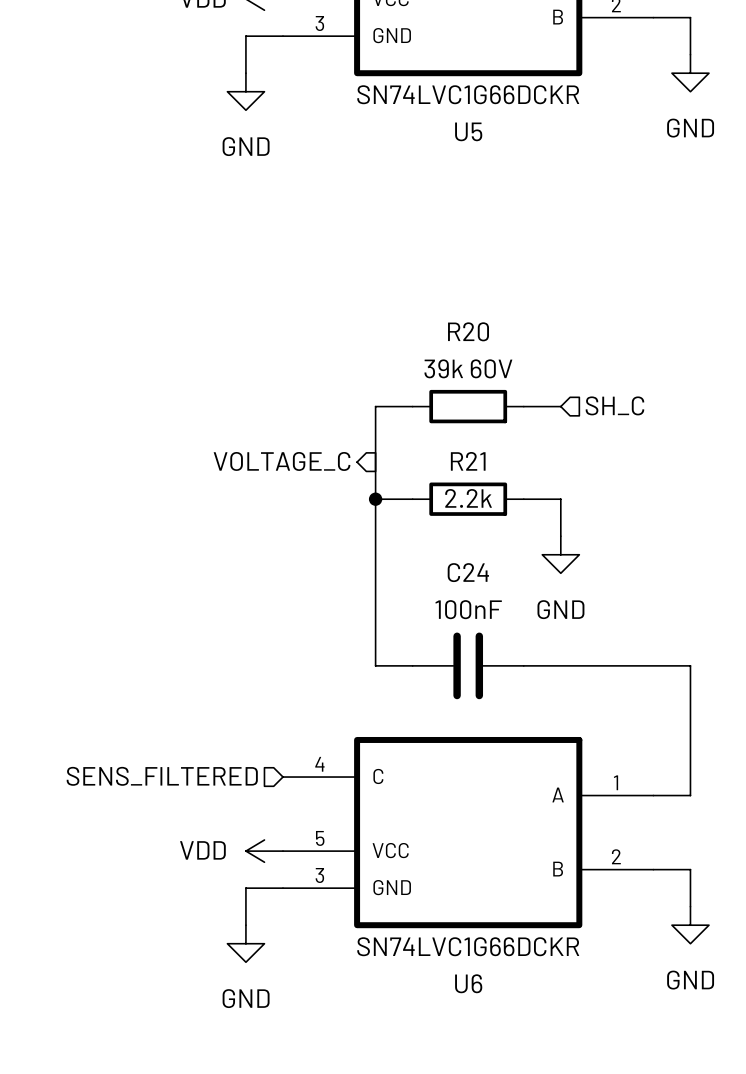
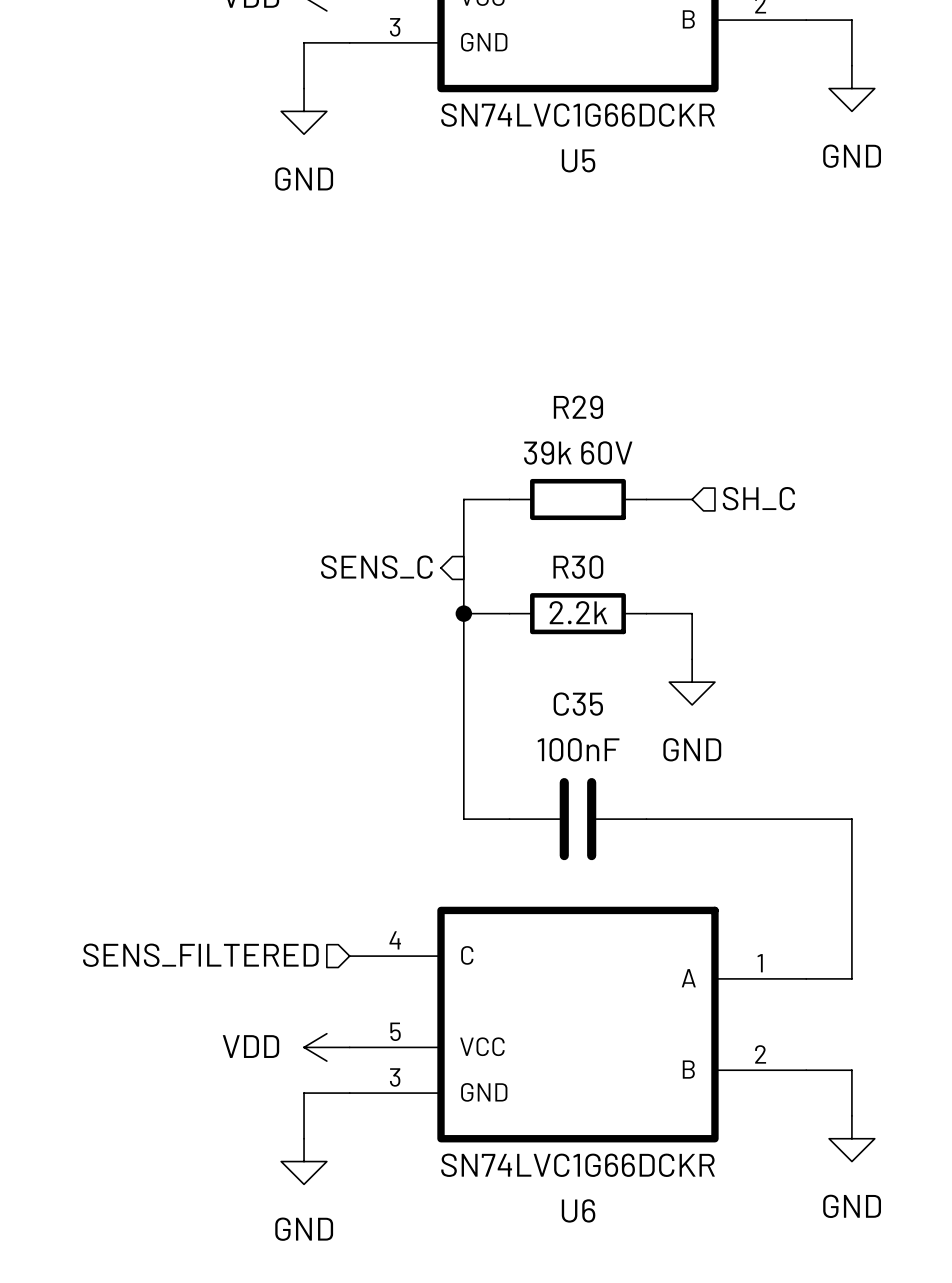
R20 name: R20 (468, 331) -> R29 (578, 407)
hierarchical label: VOLTAGE_C (282, 461) -> SENS_C (376, 567)
R21 name: R21 (468, 461) -> R30 (578, 567)
C24 name: C24 (468, 572) -> C35 (578, 704)

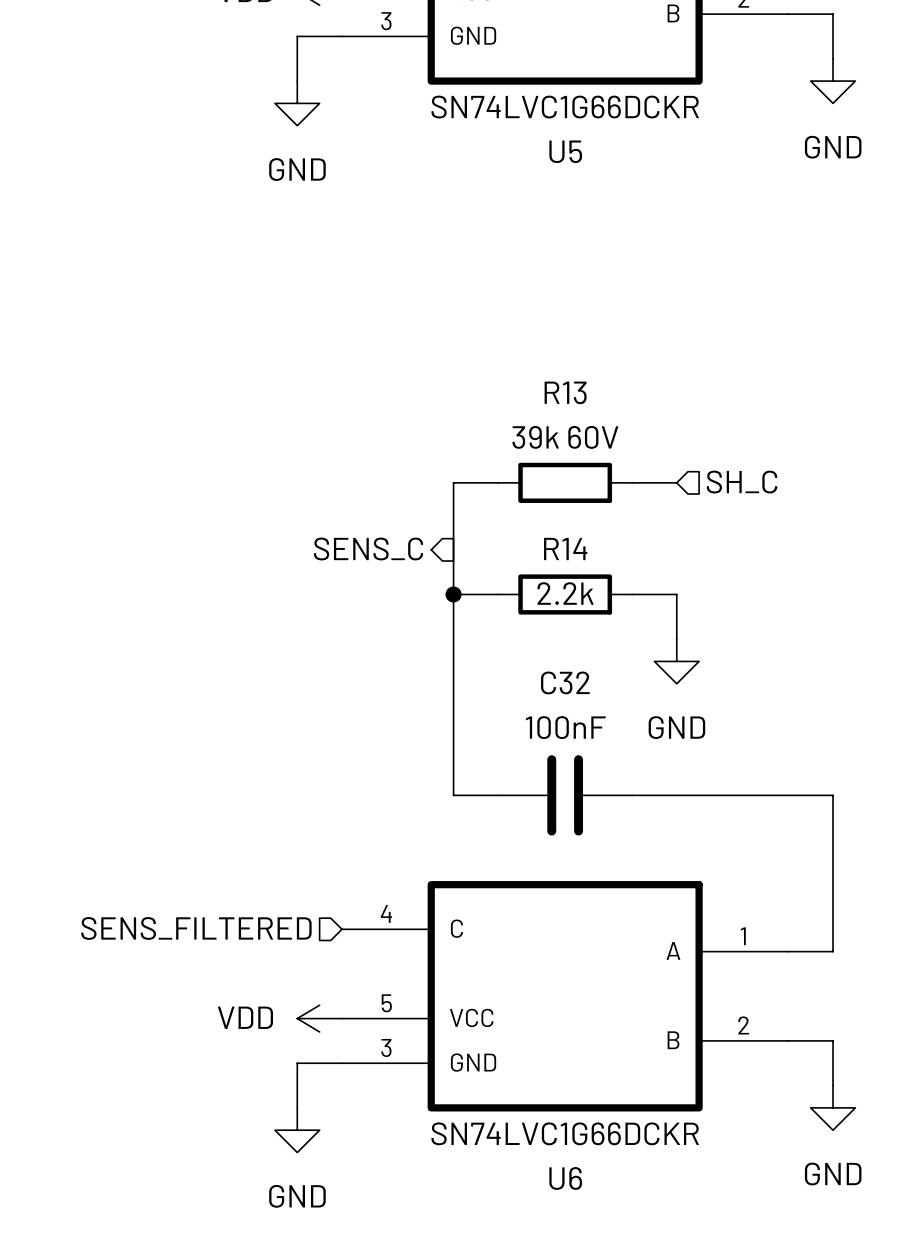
R29 name: R29 (578, 407) -> R13 (565, 392)
R30 name: R30 (578, 567) -> R14 (565, 549)
C35 name: C35 (578, 704) -> C32 (565, 682)

